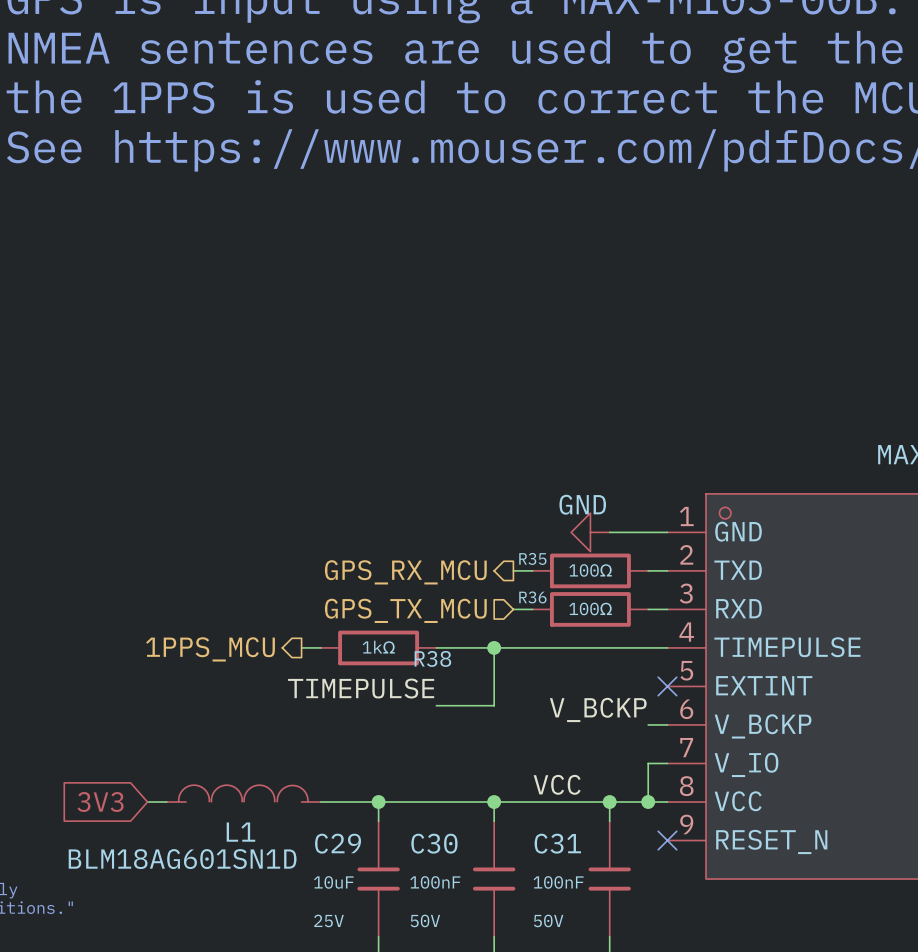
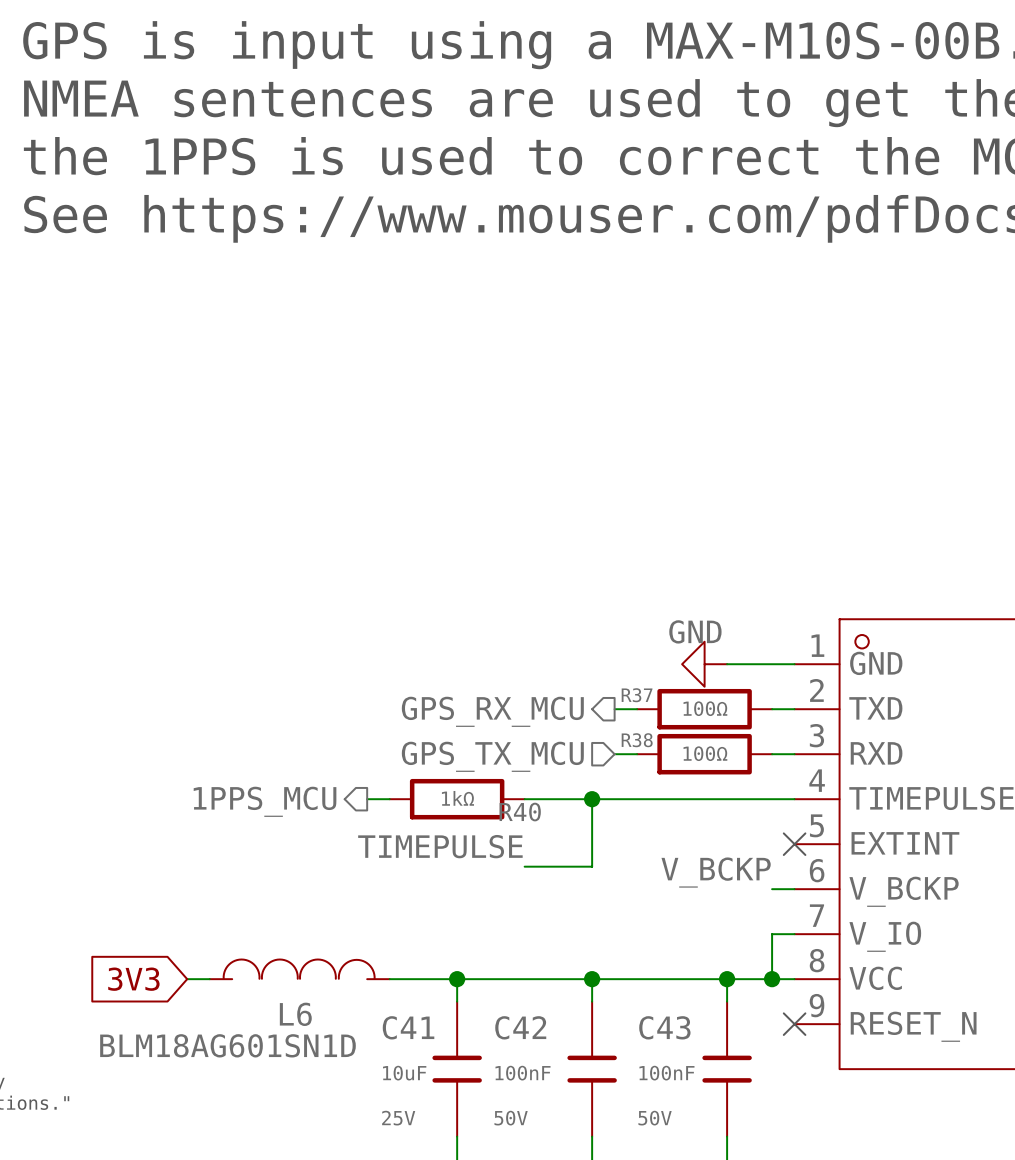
R35 name: R35 (532, 558) -> R37 (637, 695)
R36 name: R36 (532, 597) -> R38 (637, 740)
R38 name: R38 (432, 658) -> R40 (520, 812)
label: VCC (557, 784) -> none
L1 name: L1 (240, 832) -> L6 (295, 1014)
C29 name: C29 (338, 843) -> C41 (408, 1027)
C30 name: C30 (434, 843) -> C42 (520, 1027)
C31 name: C31 (557, 843) -> C43 (664, 1027)

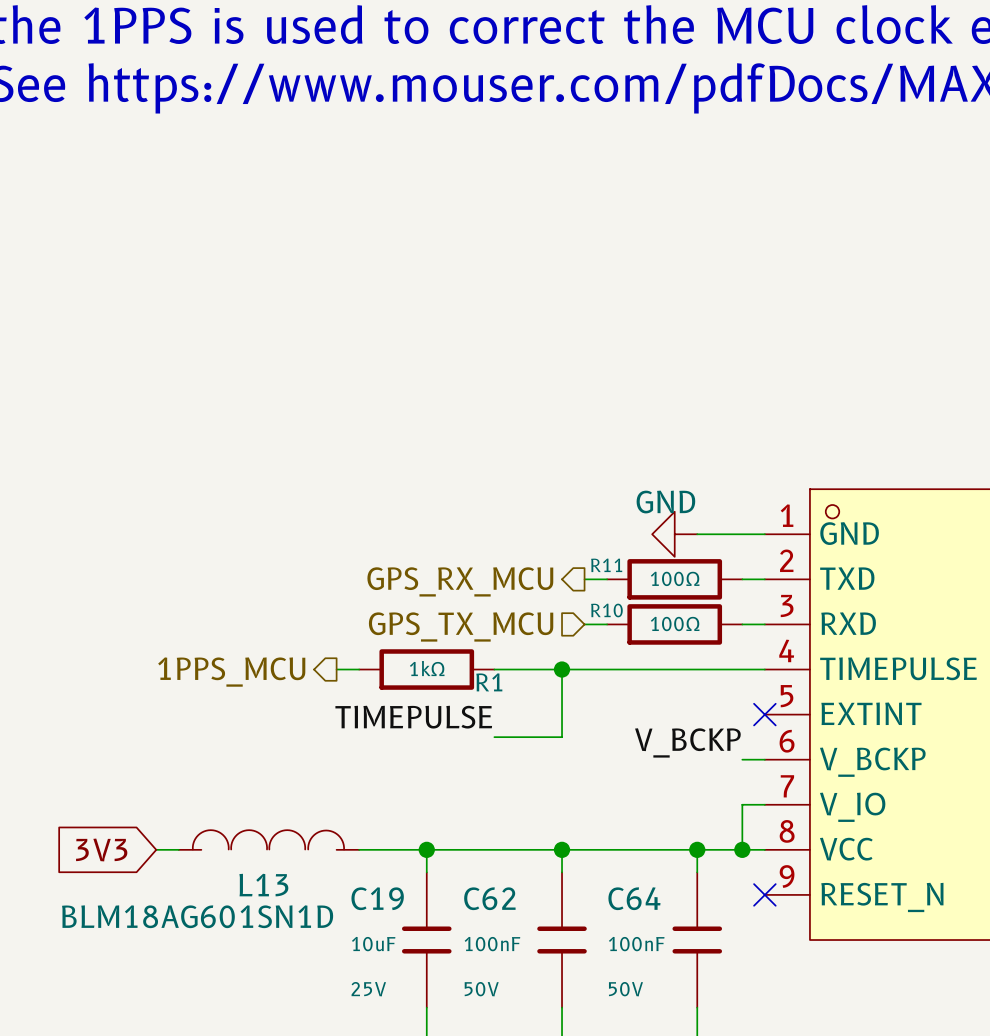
R37 name: R37 (637, 695) -> R11 (606, 565)
R38 name: R38 (637, 740) -> R10 (606, 610)
R40 name: R40 (520, 812) -> R1 (489, 682)
L6 name: L6 (295, 1014) -> L13 (263, 885)
C41 name: C41 (408, 1027) -> C19 (377, 898)
C42 name: C42 (520, 1027) -> C62 (489, 898)
C43 name: C43 (664, 1027) -> C64 (634, 898)

